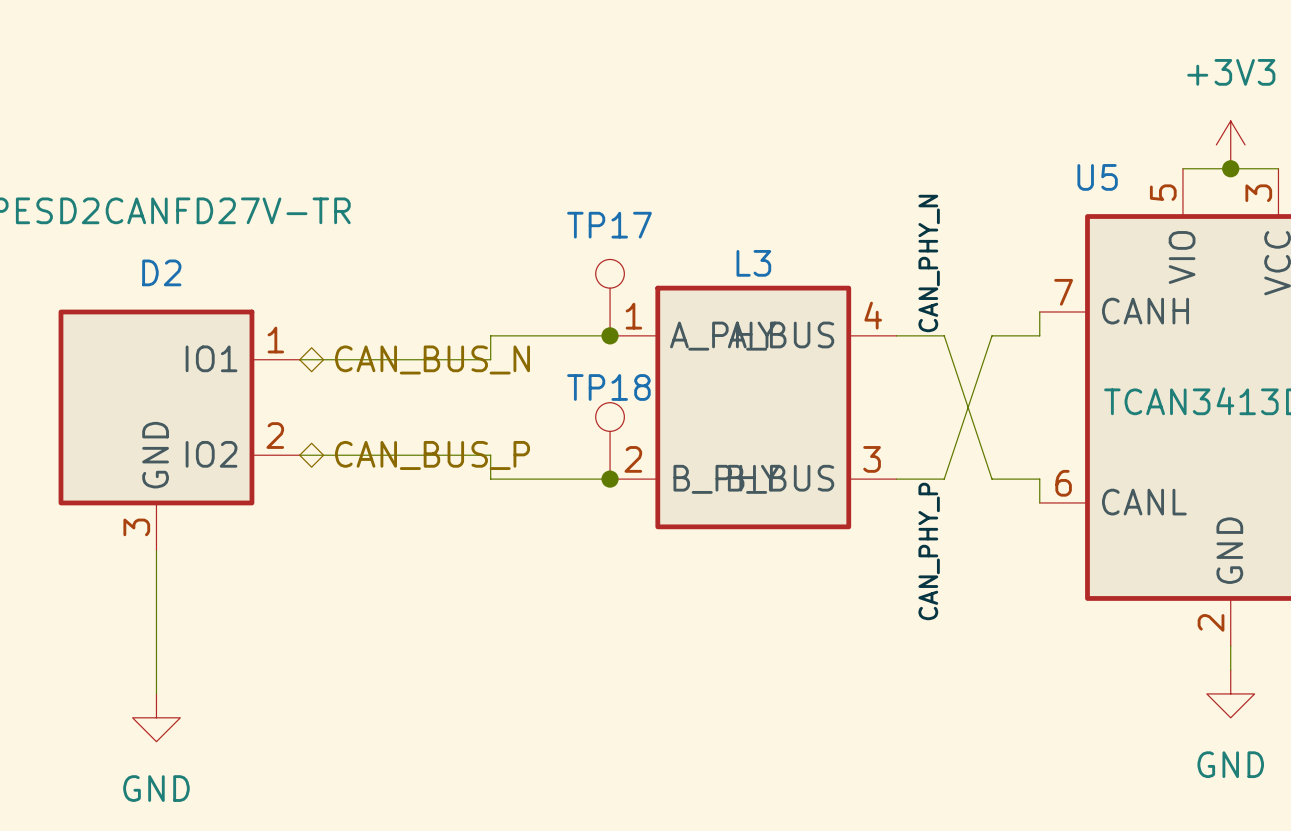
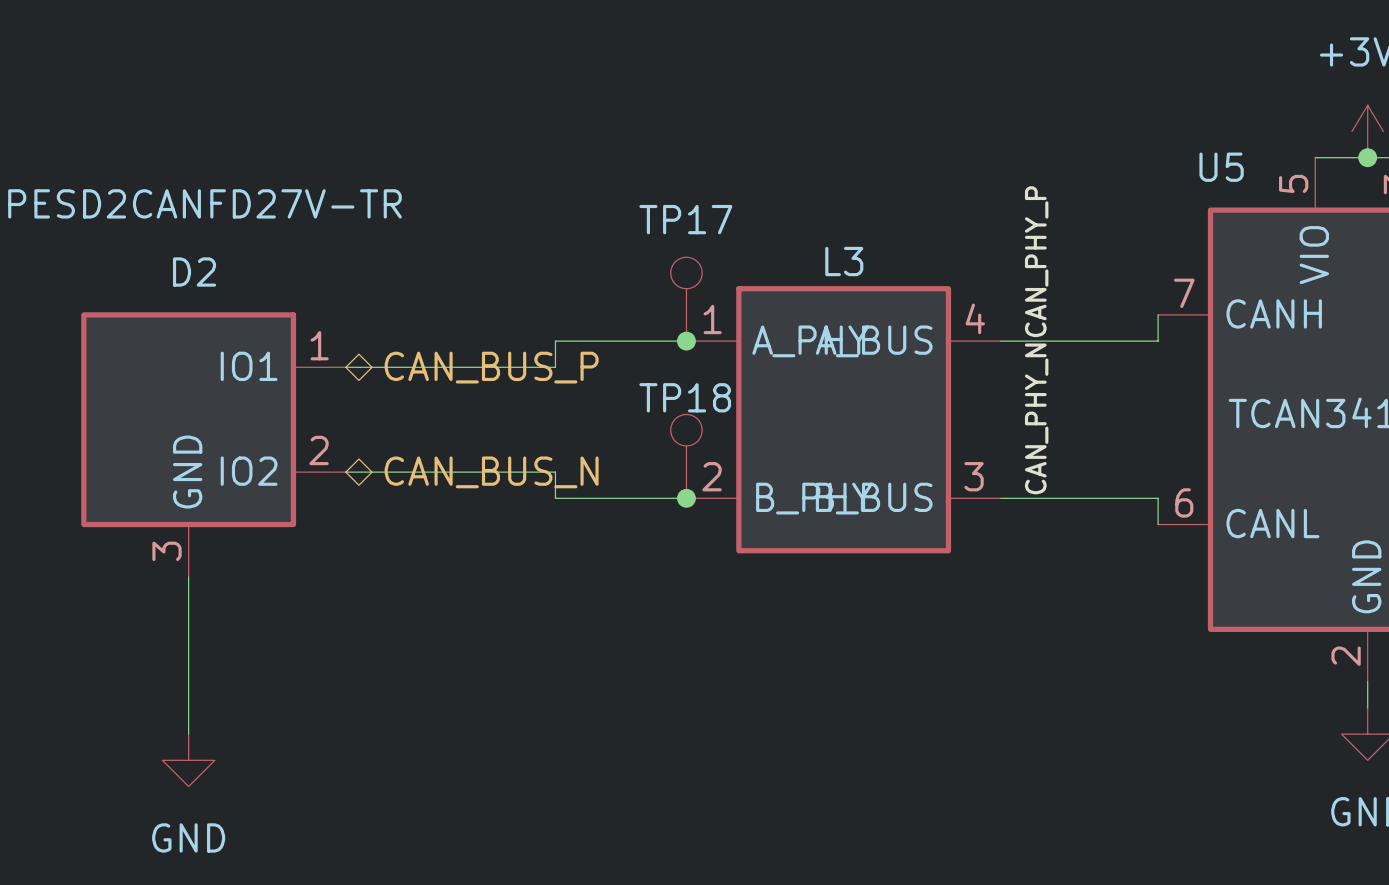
label: CAN_PHY_N (929, 263) -> CAN_PHY_P (1036, 261)
wire: (944, 335) (991, 479) -> (1053, 341) (1105, 341)
wire: (991, 335) (944, 479) -> (1105, 498) (1053, 498)
hierarchical label: CAN_BUS_N (432, 359) -> CAN_BUS_P (491, 367)
hierarchical label: CAN_BUS_P (432, 455) -> CAN_BUS_N (491, 472)
label: CAN_PHY_P (929, 551) -> CAN_PHY_N (1036, 418)

